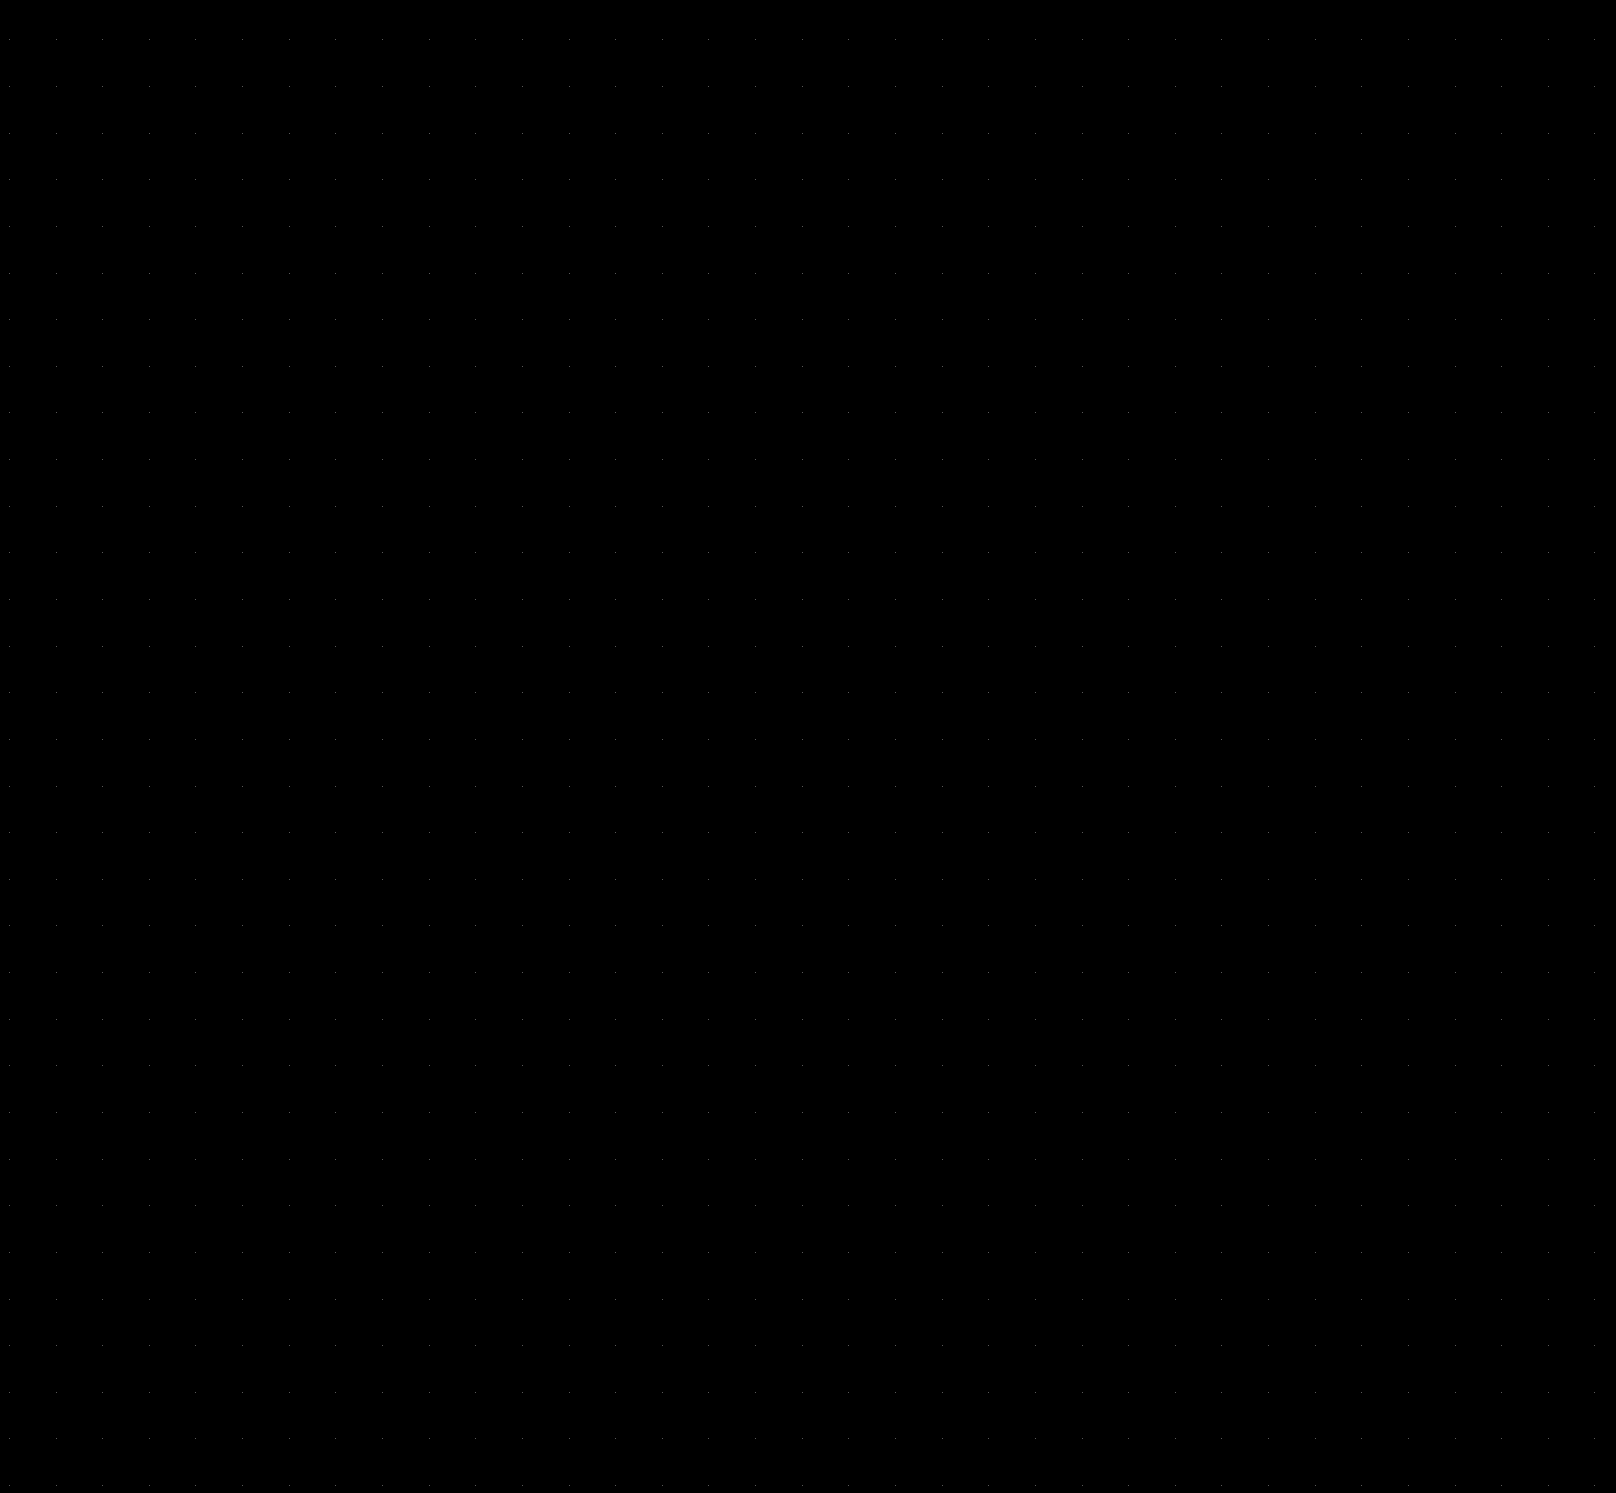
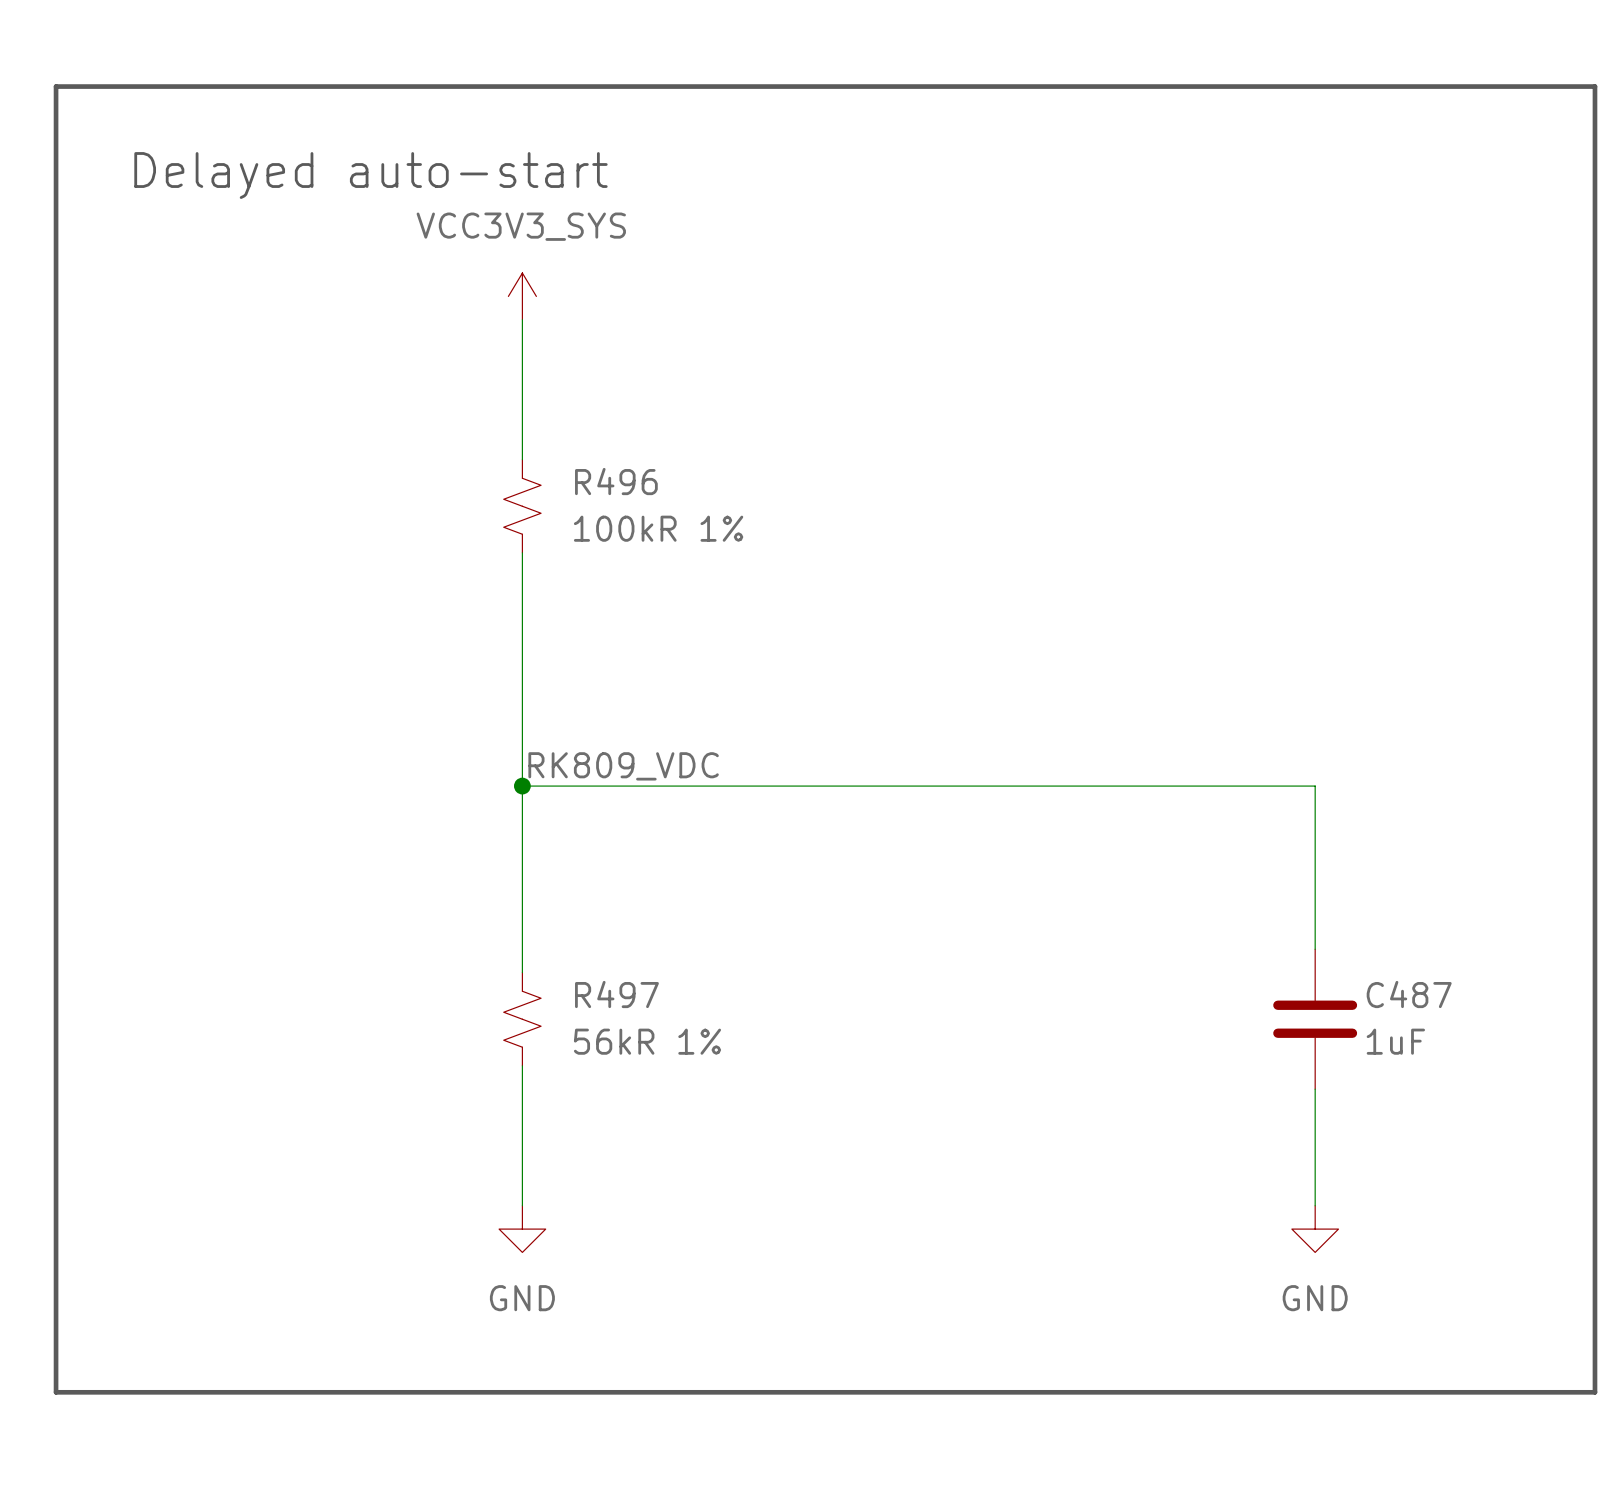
line: none -> (56, 86) (56, 1392) (1594, 1392) (1594, 86) (56, 86)
text: none -> Delayed auto-start (370, 175)
power symbol: none -> VCC3V3_SYS (522, 296)
wire: none -> (522, 319) (522, 459)
R496: none -> 100kR 1% (522, 506)
wire: none -> (522, 552) (522, 972)
label: none -> RK809_VDC (623, 766)
wire: none -> (522, 786) (1315, 786) (1315, 949)
junction: none -> (522, 786)
R497: none -> 56kR 1% (522, 1019)
C487: none -> 1uF (1315, 1019)
wire: none -> (522, 1065) (522, 1205)
wire: none -> (1315, 1089) (1315, 1205)
power symbol: none -> GND (522, 1229)
power symbol: none -> GND (1315, 1229)

